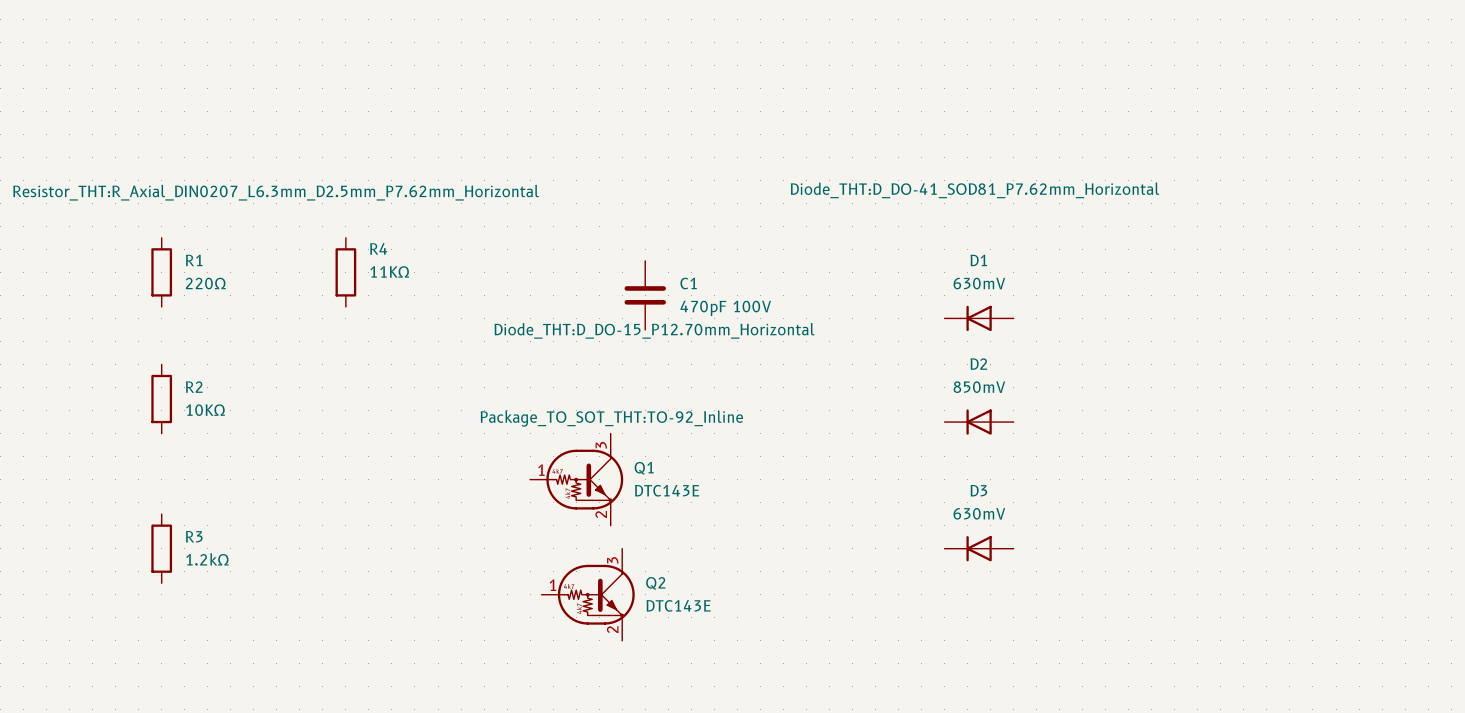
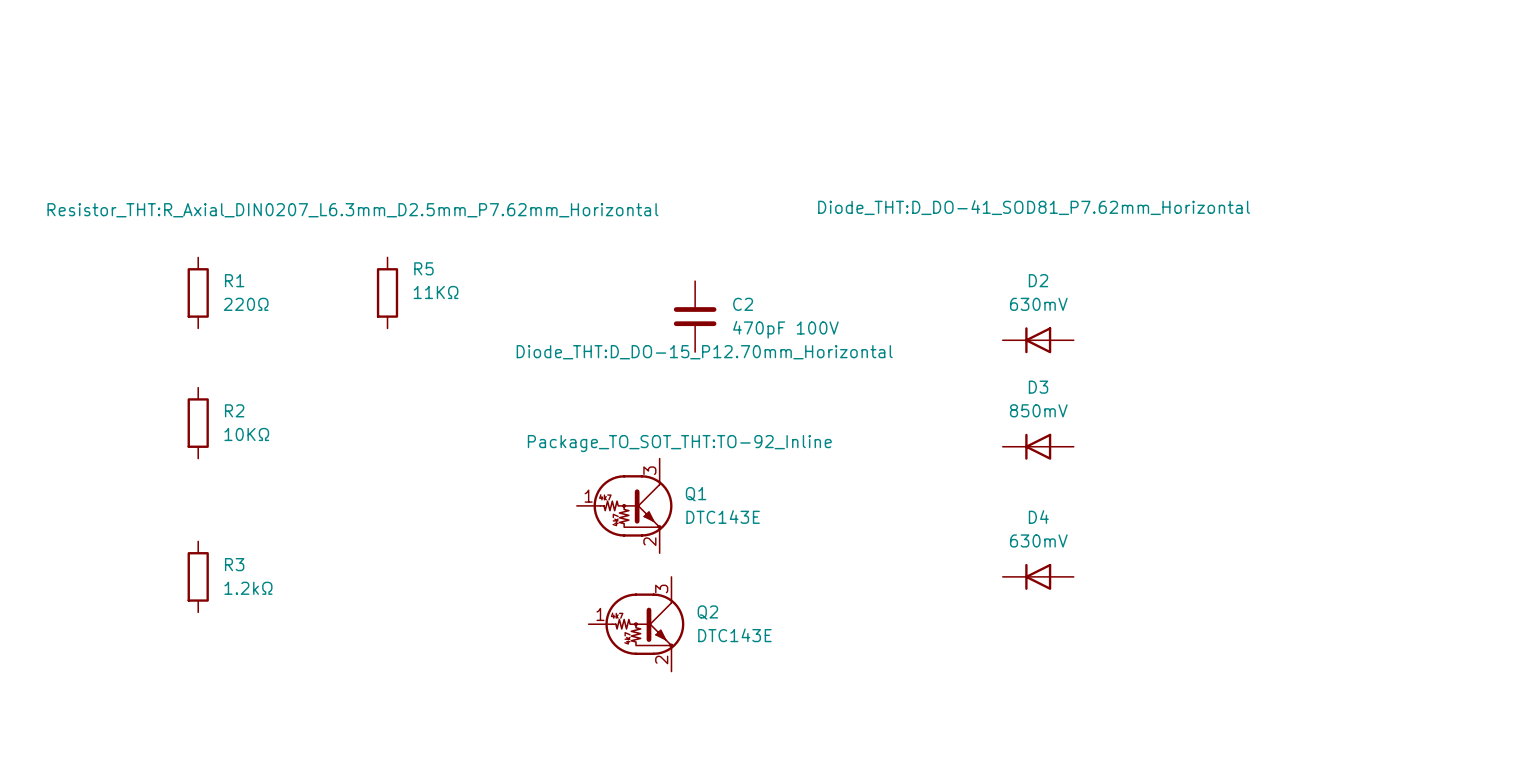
R4 name: R4 (378, 248) -> R5 (423, 268)
D1 name: D1 (978, 260) -> D2 (1038, 280)
C1 name: C1 (688, 283) -> C2 (743, 304)
D2 name: D2 (978, 364) -> D3 (1038, 387)
D3 name: D3 (978, 490) -> D4 (1038, 517)

